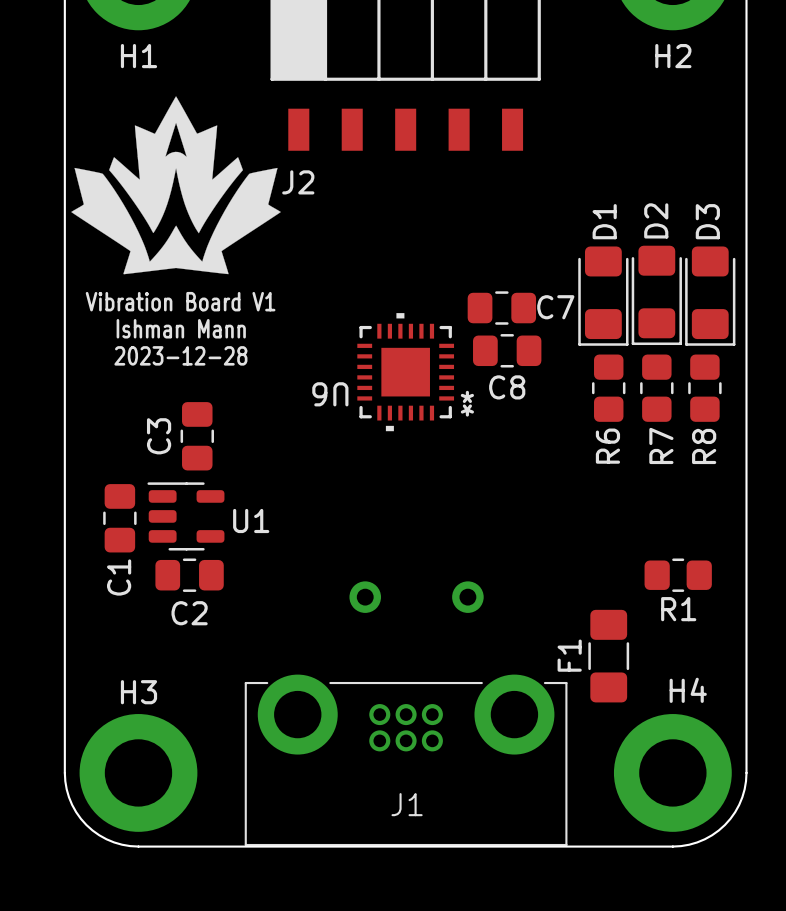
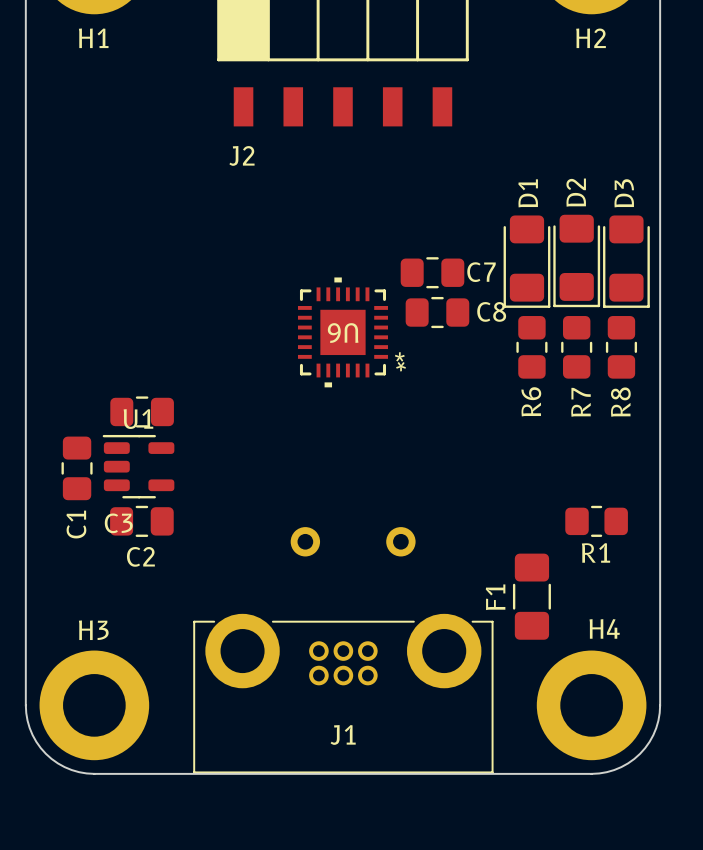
drawing: [71, 96, 281, 275] -> none
text: Vibration Board V1 (180, 301) -> none
text: Ishman Mann (181, 328) -> none
text: 2023-12-28 (180, 355) -> none
C8 name position: C8 (507, 387) -> C8 (491, 311)
U6 name position: U6 (330, 394) -> U6 (343, 333)
C3 name position: C3 (159, 436) -> C3 (118, 523)
C3 rotation: 0° (197, 436) -> 90° clockwise (142, 411)
U1 name position: U1 (251, 520) -> U1 (138, 419)

